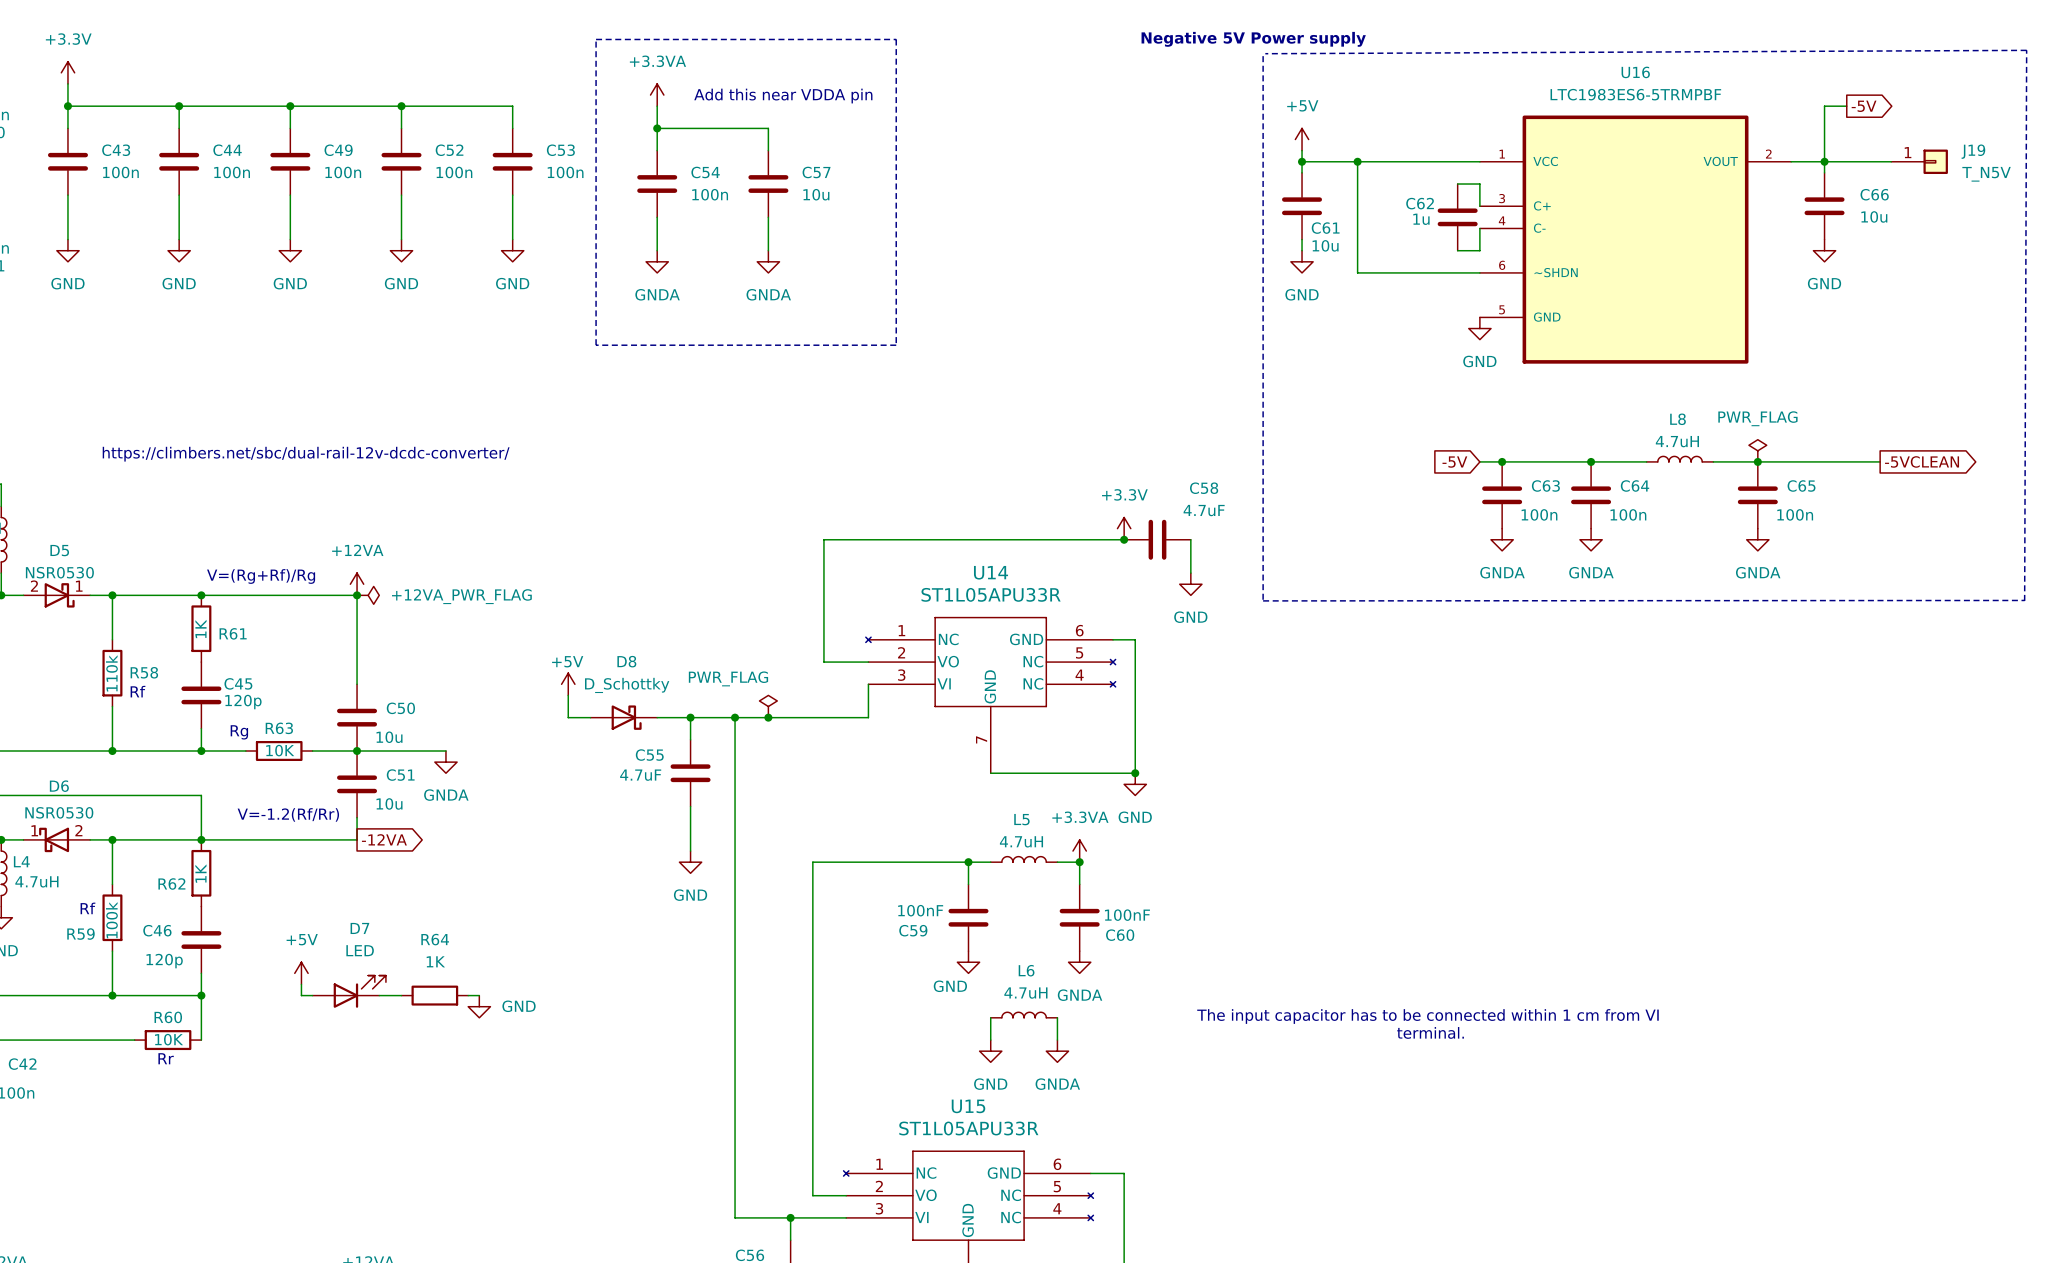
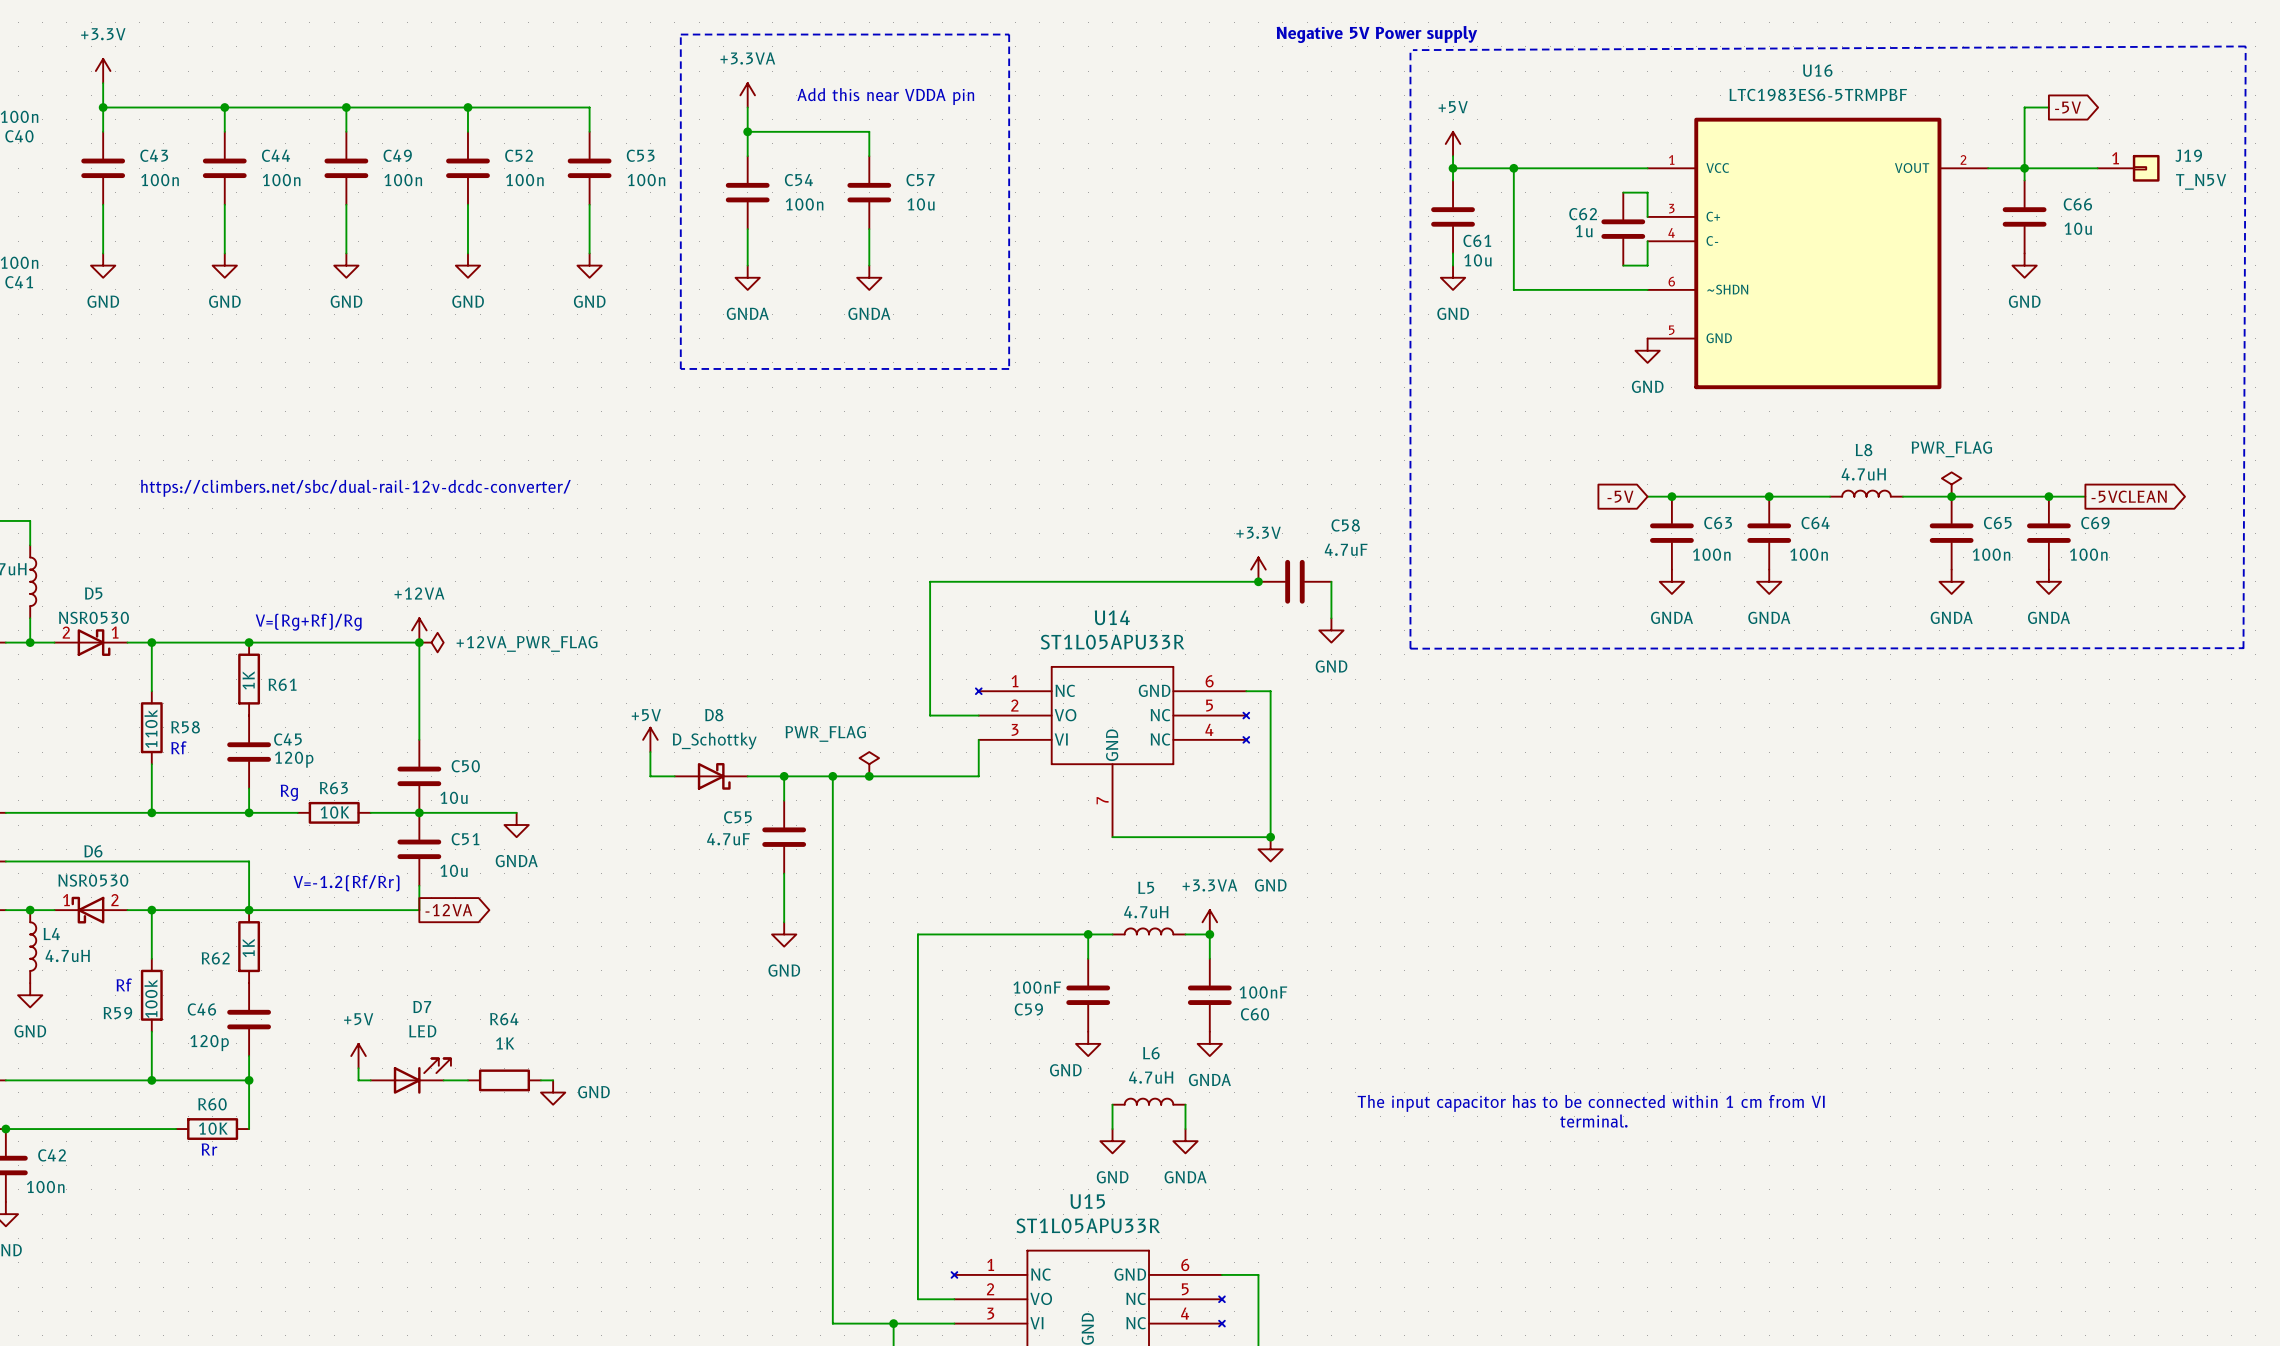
junction: none -> (2048, 496)
C69: none -> 100n (2048, 533)
power symbol: none -> GNDA (2048, 581)

